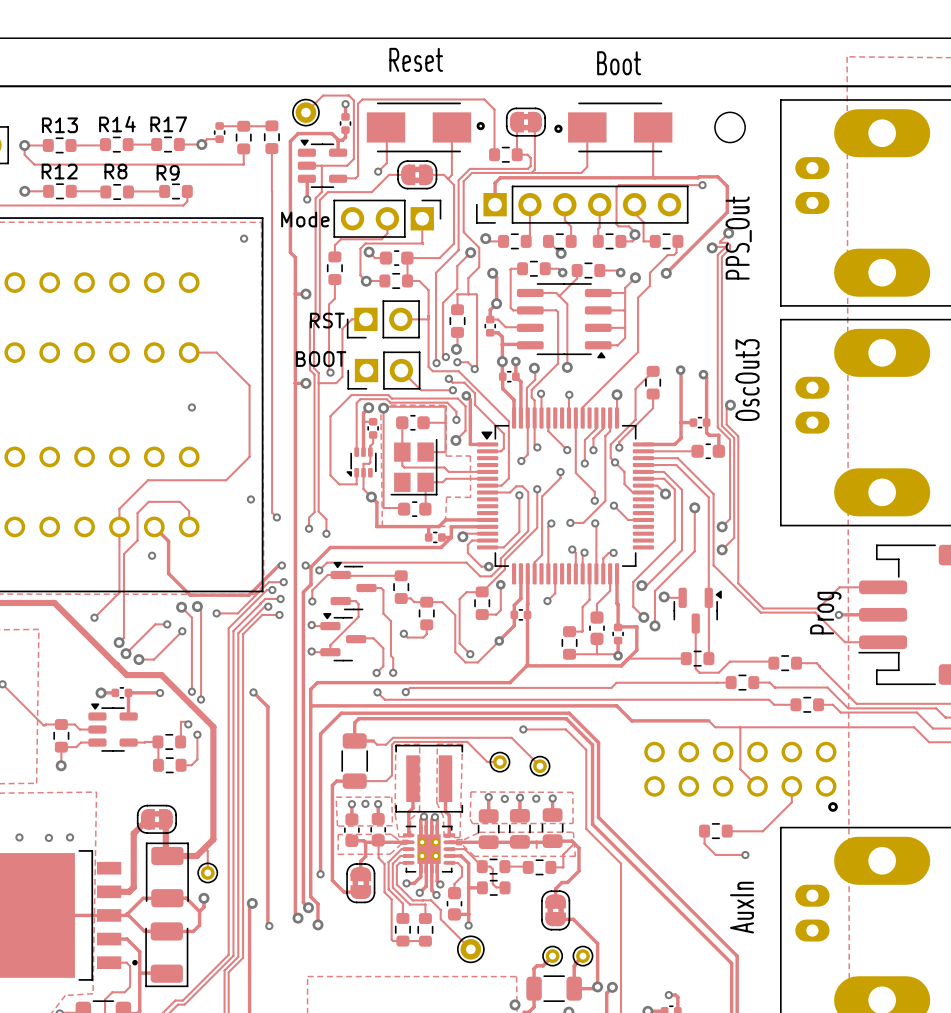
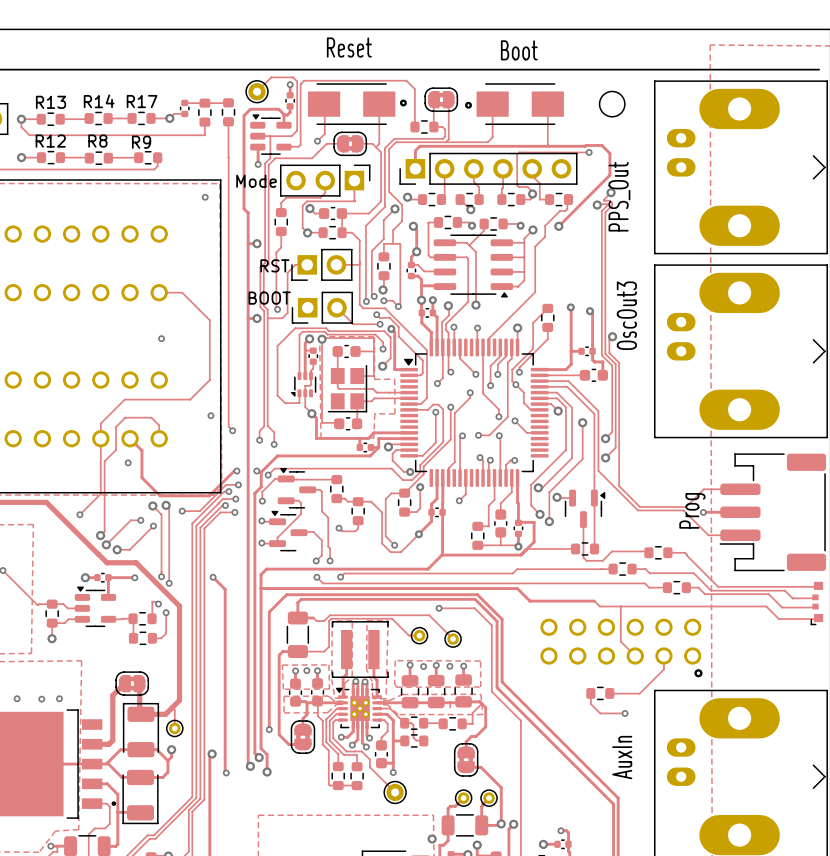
part footprint: [402, 824, 456, 874] -> [335, 687, 382, 729]

